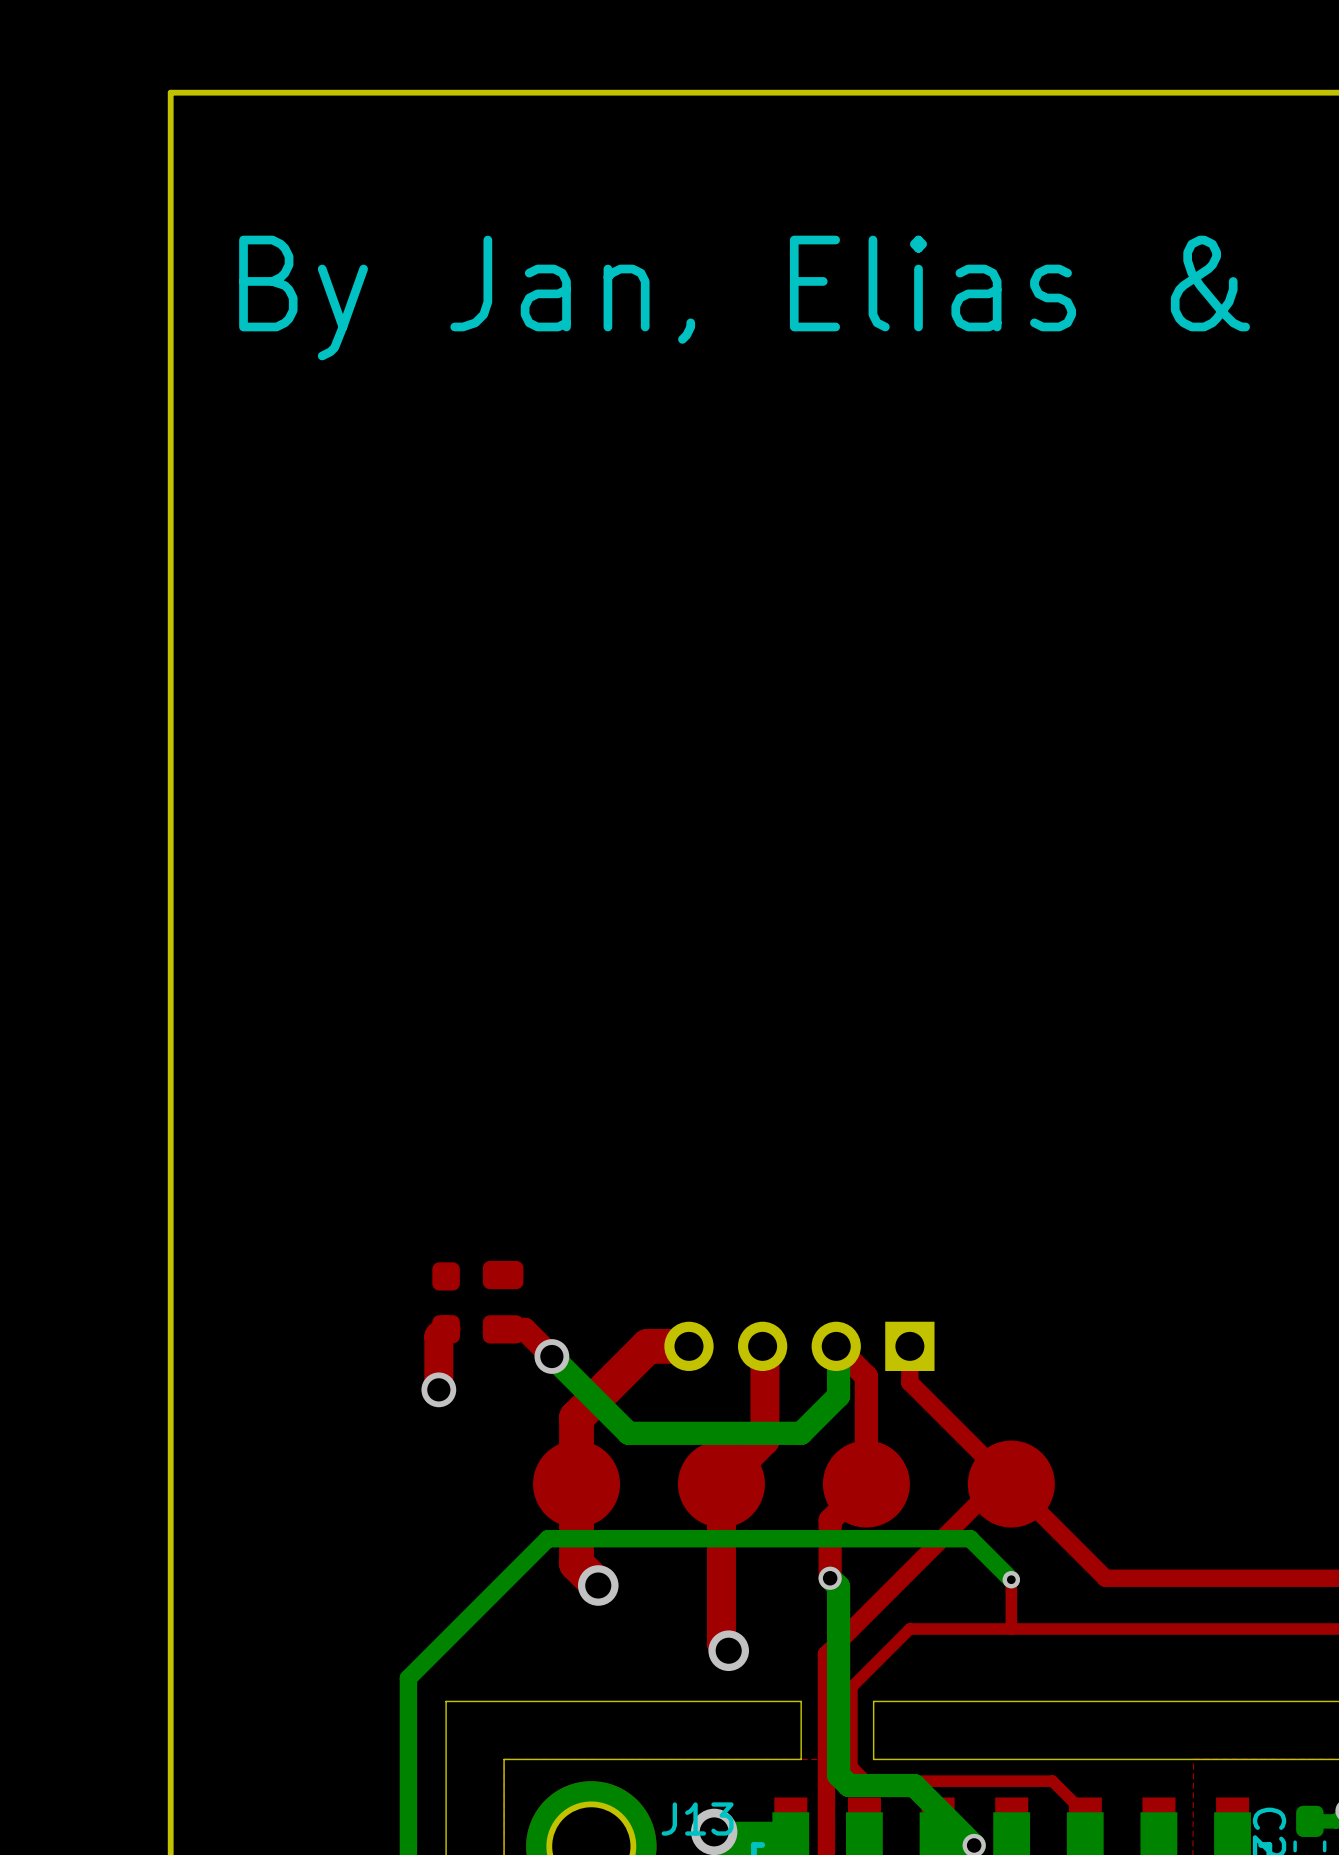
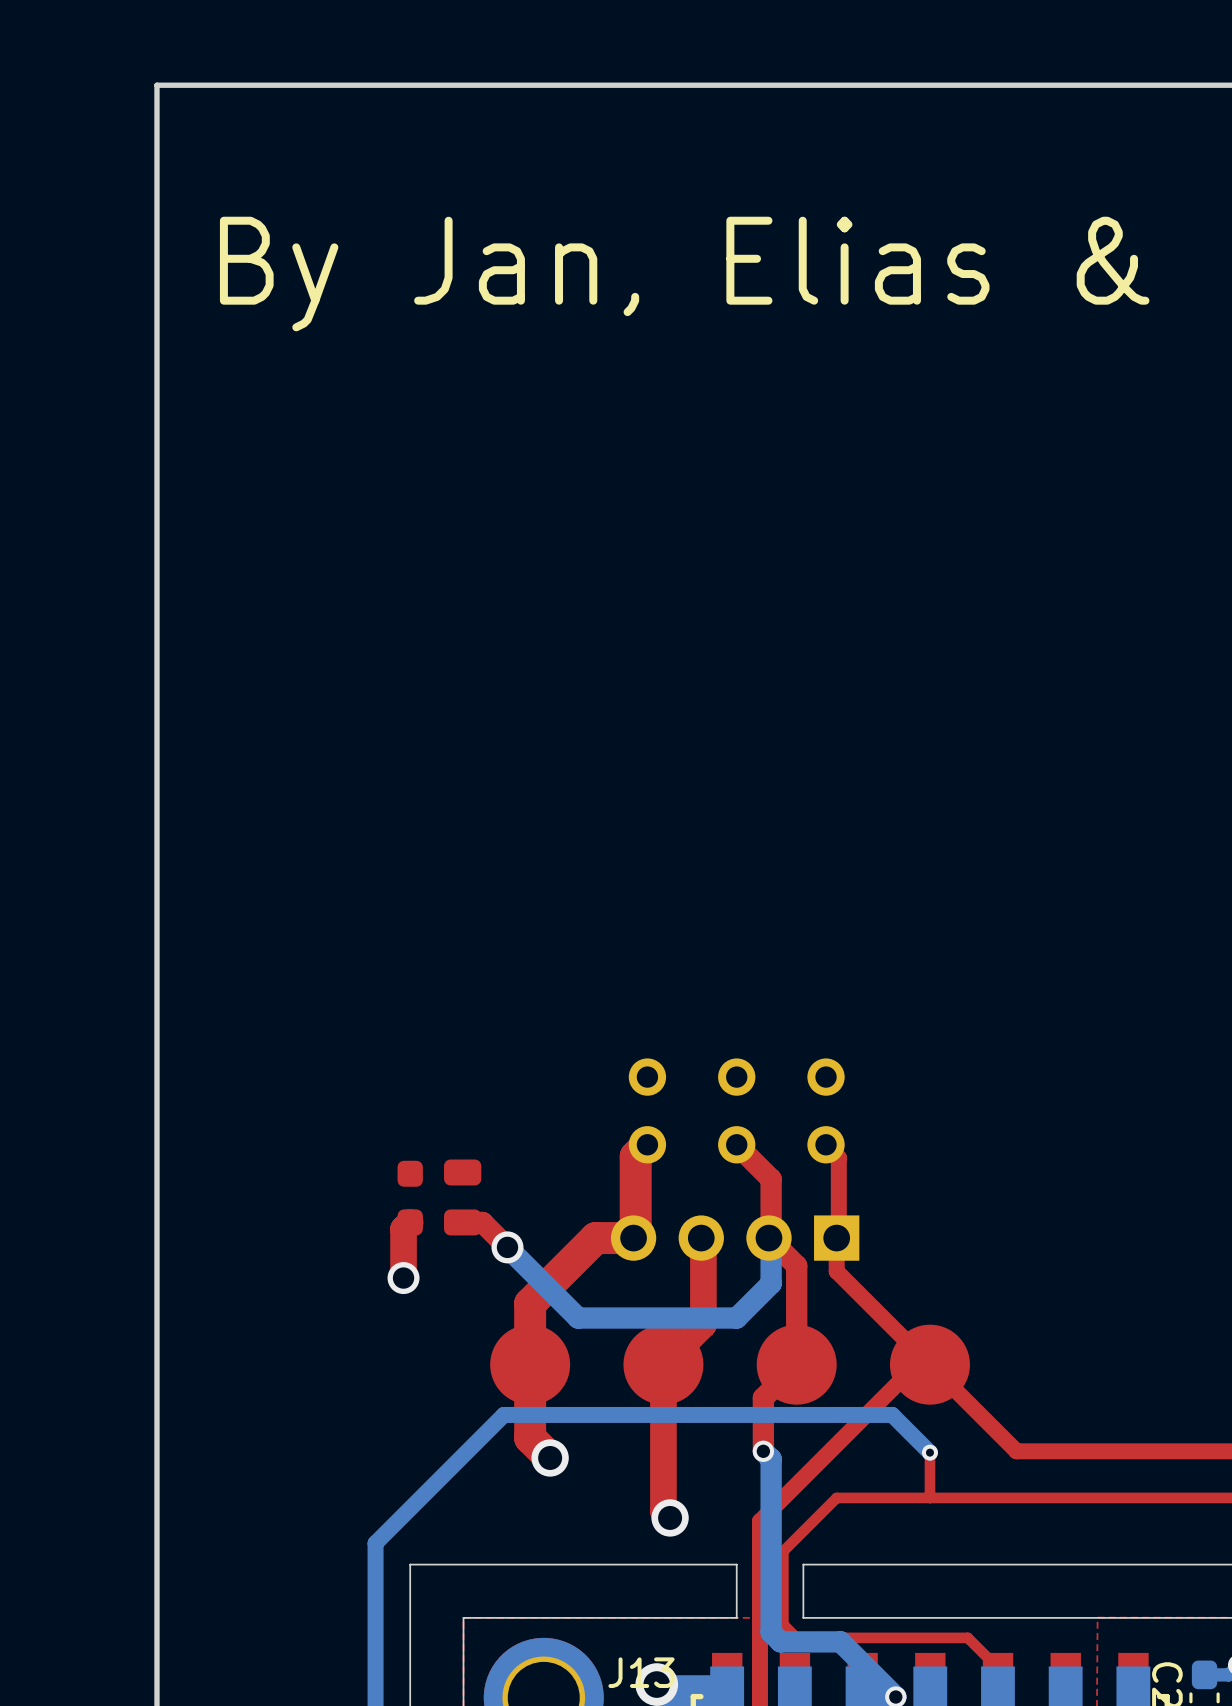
part: none -> (647, 1110)
part: none -> (736, 1110)
part: none -> (826, 1110)
top track: none -> (647, 1144) (635, 1156) (635, 1235)
top track: none -> (736, 1144) (771, 1179) (771, 1235)
top track: none -> (826, 1144) (838, 1157) (838, 1235)

